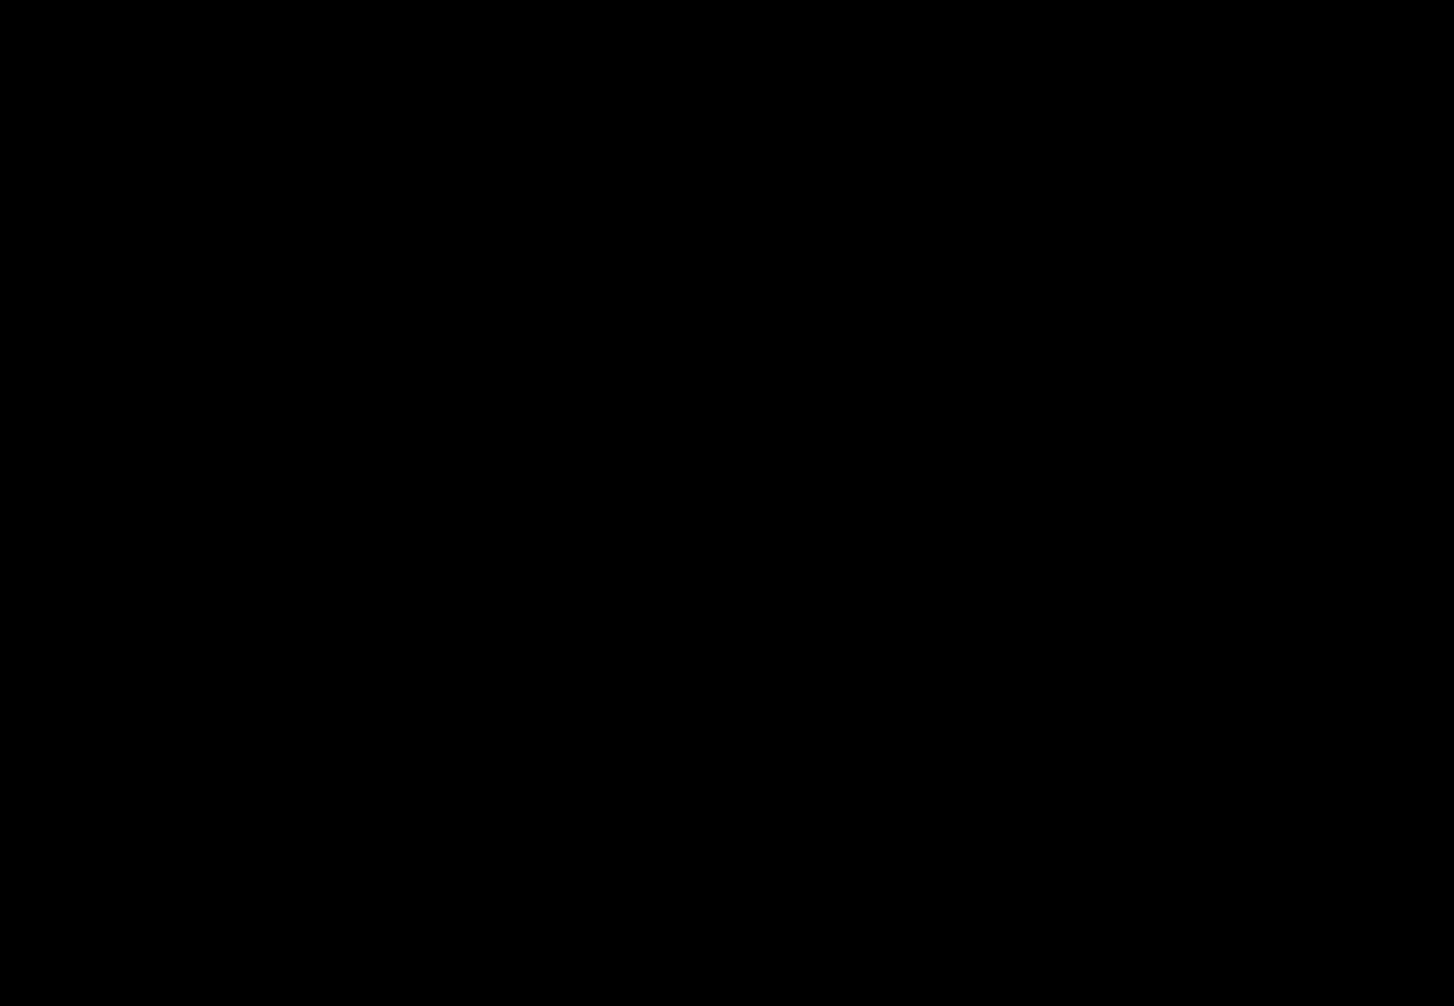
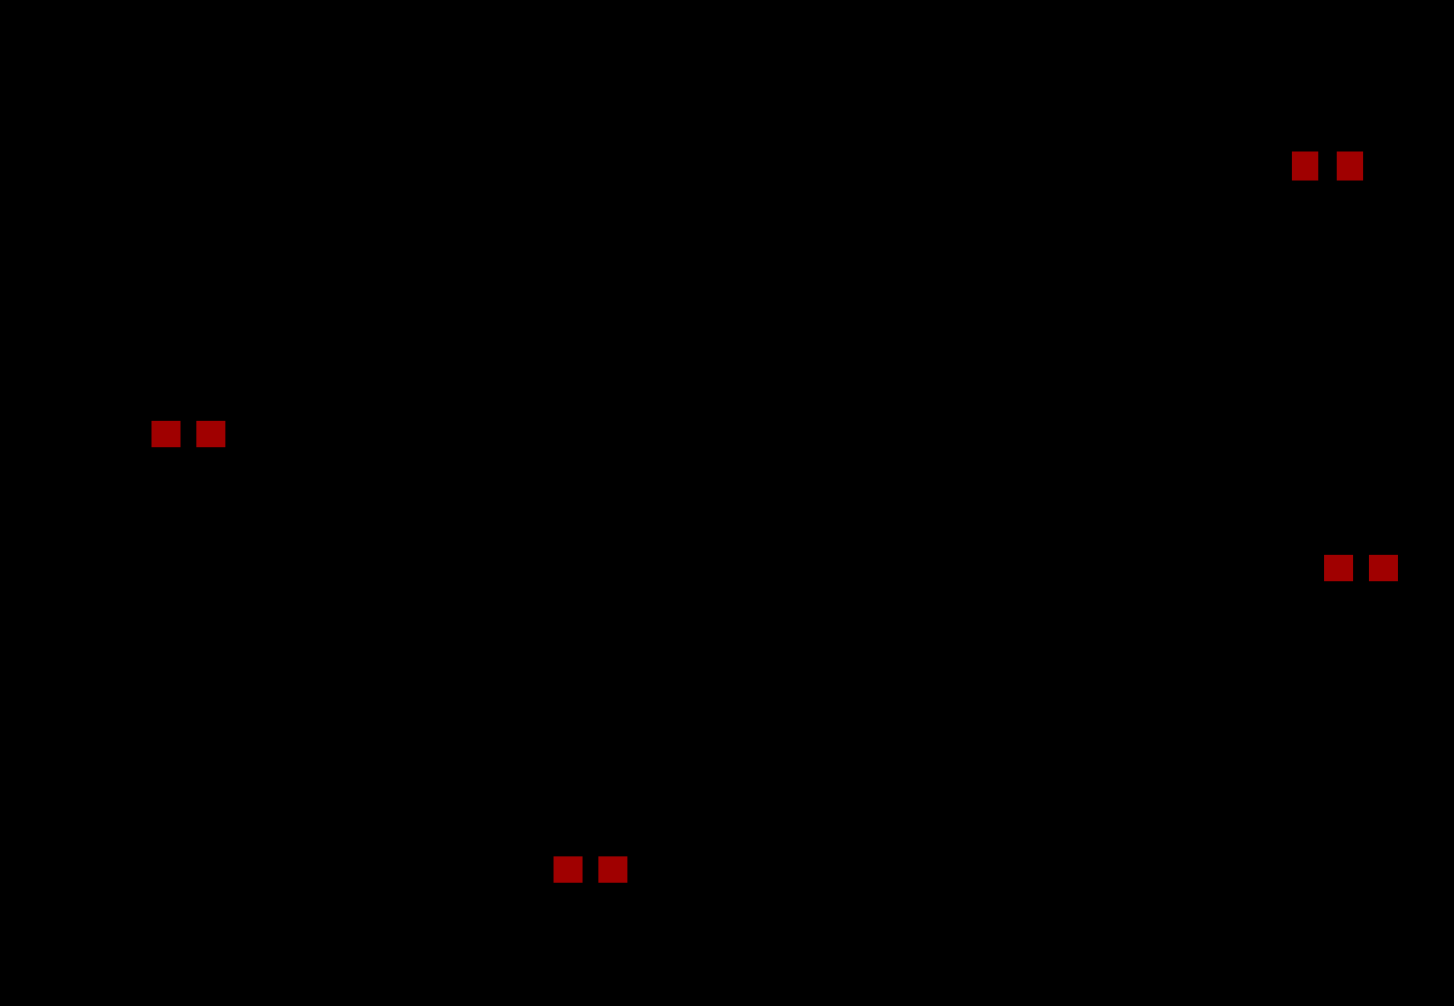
part: none -> (1327, 166)
part: none -> (188, 434)
part: none -> (1361, 568)
part: none -> (590, 869)

